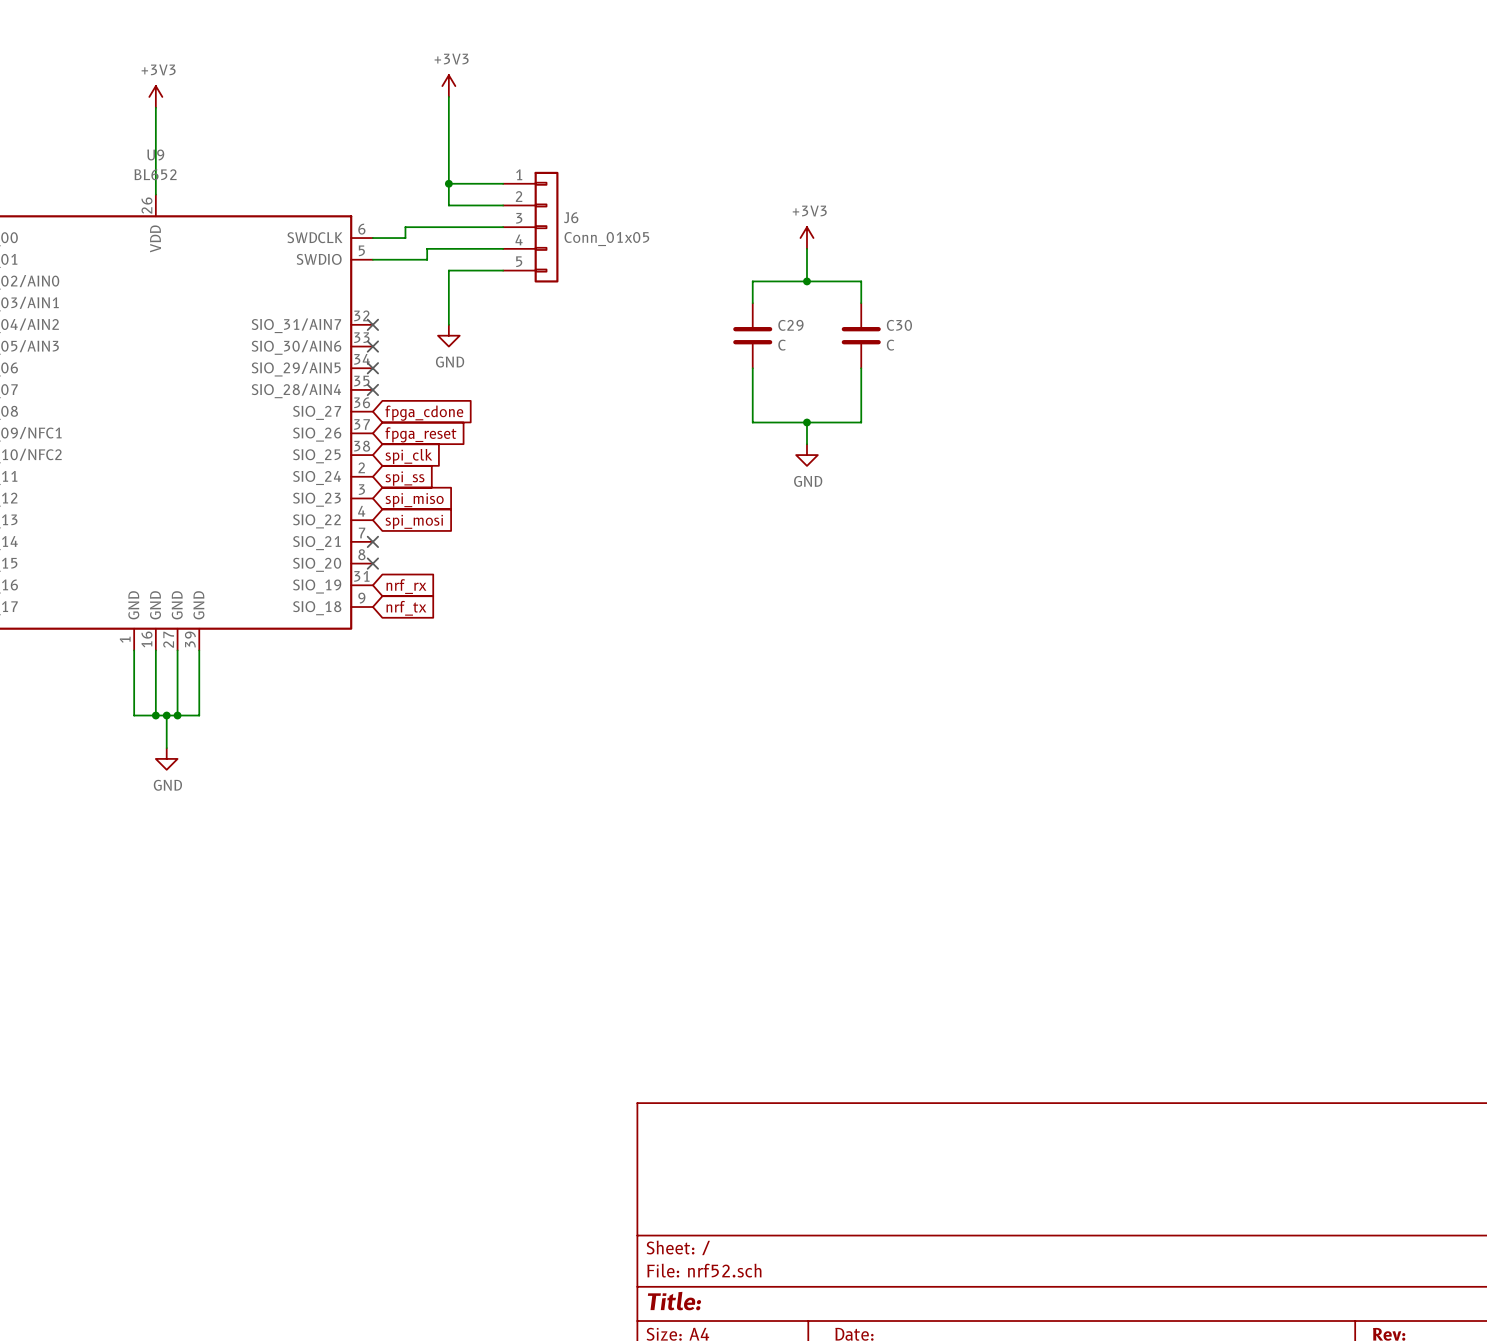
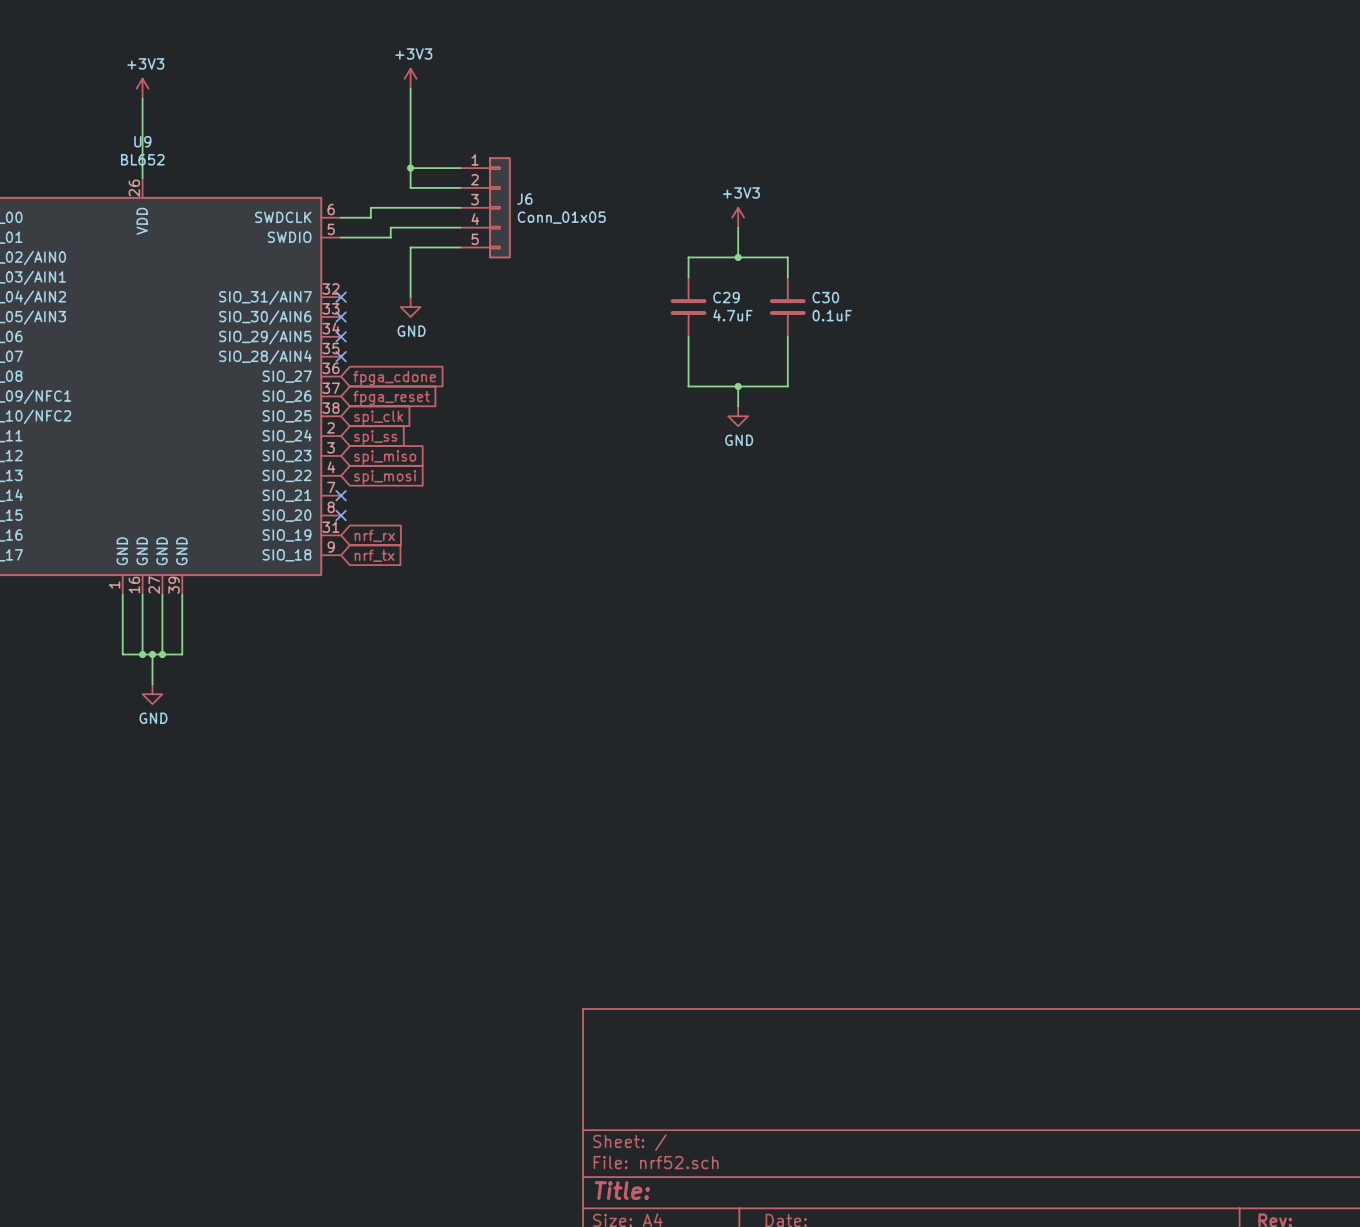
C29 value: C (782, 345) -> 4.7uF (732, 315)
C30 value: C (890, 345) -> 0.1uF (832, 315)

